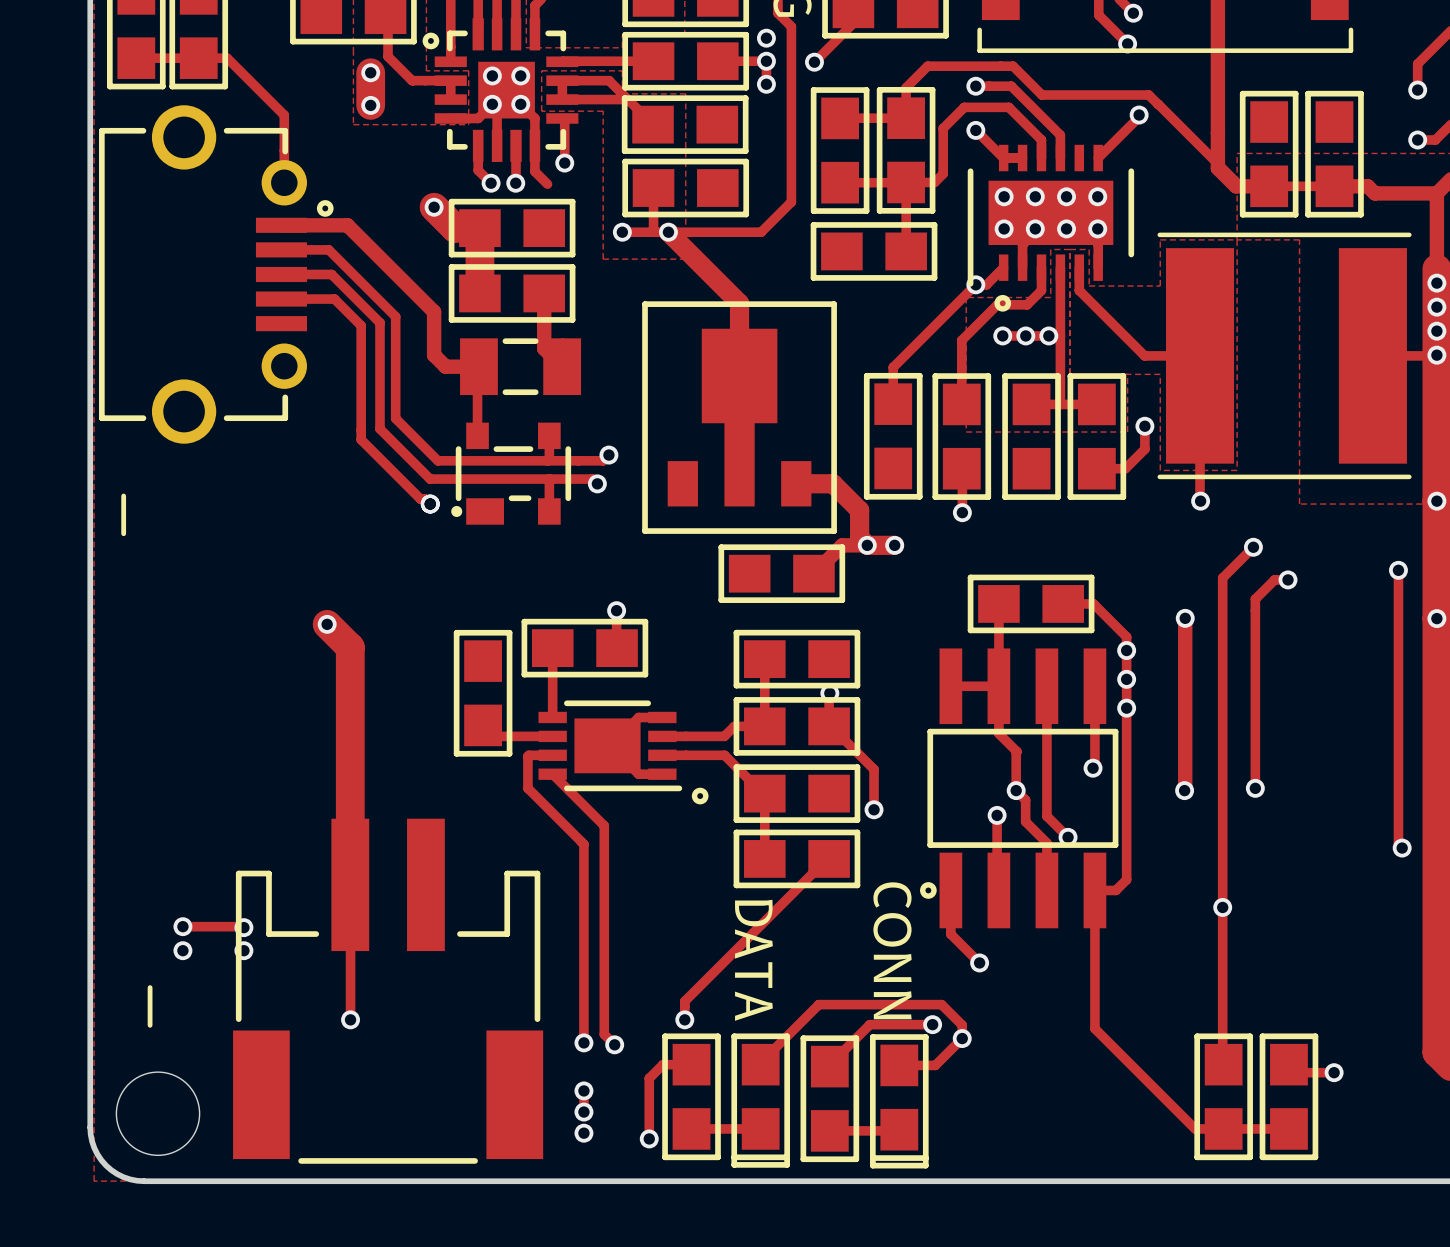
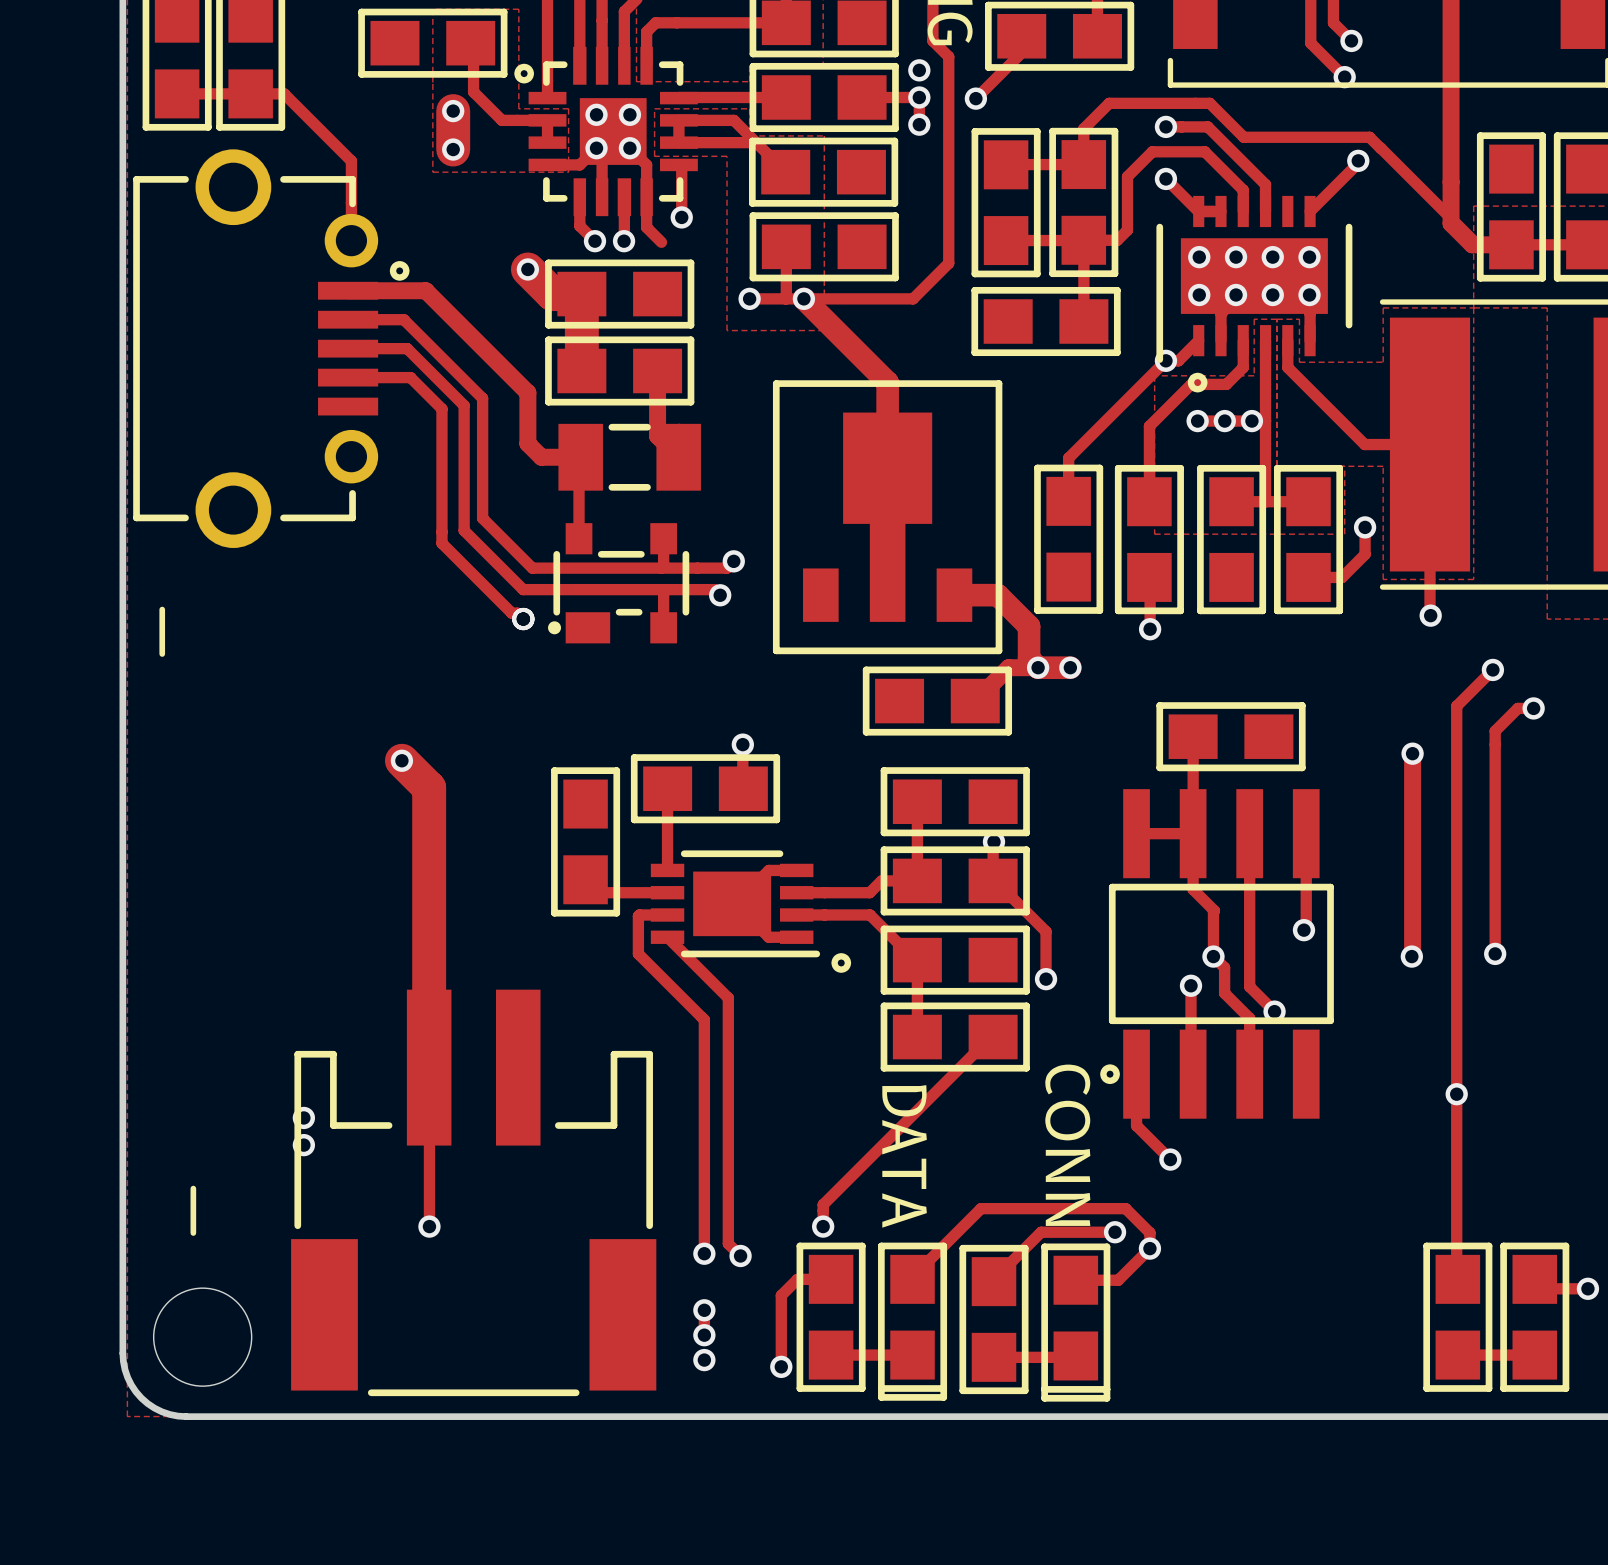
track: (1063, 603) (1093, 603) (1126, 636) (1126, 879) (1115, 890) (1094, 890) (1094, 1028) (1195, 1128) (1223, 1128) -> none
via: (1126, 650) -> none
via: (1126, 679) -> none
via: (1126, 708) -> none
track: (182, 926) (243, 927) -> none
via: (182, 926) -> none
via: (182, 950) -> none

